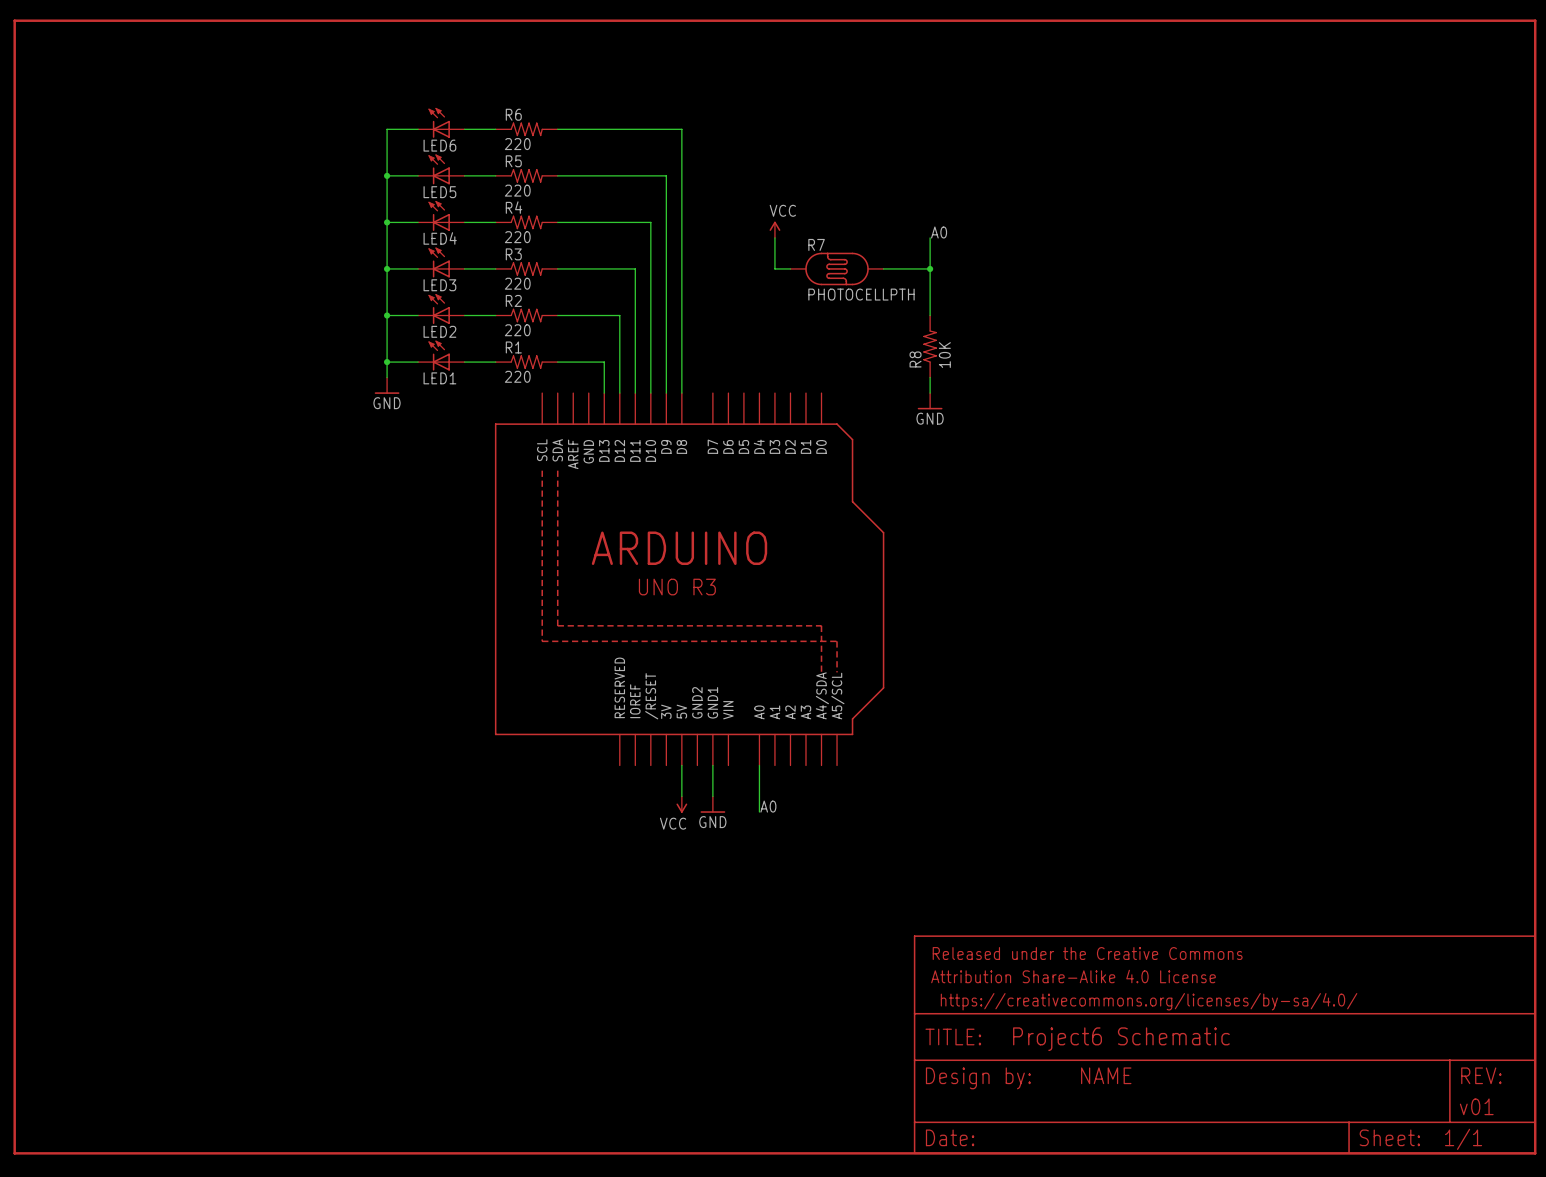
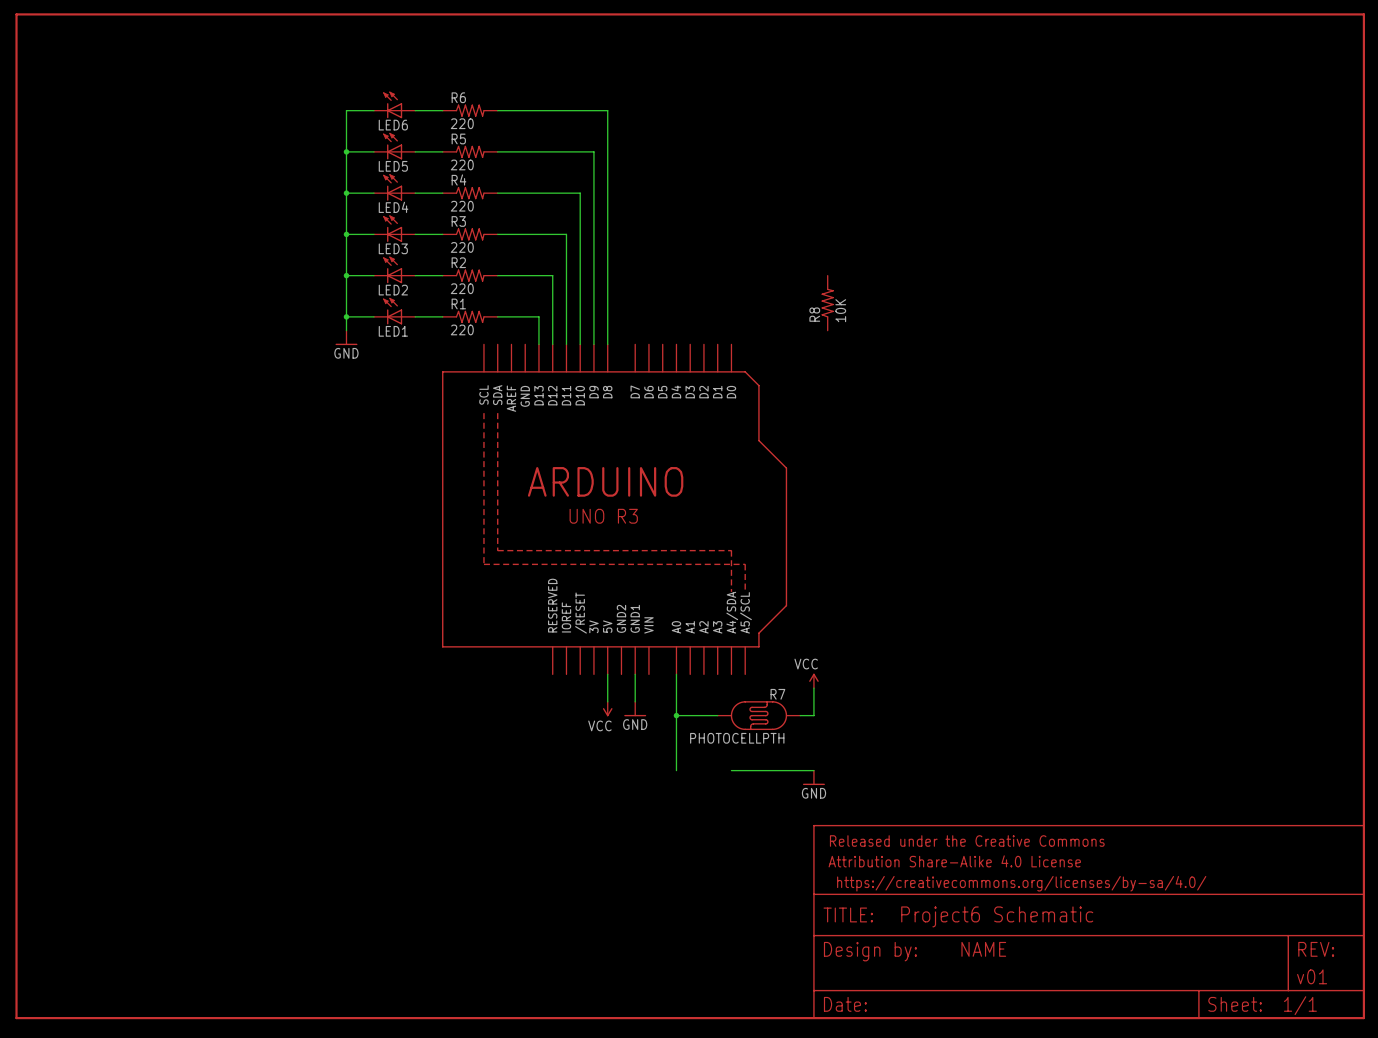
power symbol: VCC (774, 229) -> none
label: A0 (939, 232) -> none
wire: (774, 237) (774, 268) (790, 268) -> none
wire: (930, 237) (930, 315) -> none
R7 flip: as is (837, 268) -> left-right (758, 715)
R7 position: (837, 268) -> (758, 715)
wire: (883, 268) (930, 268) -> none
junction: (930, 268) -> none
wire: (930, 377) (930, 393) -> none
power symbol: GND (930, 401) -> none
power symbol: none -> VCC (813, 680)
wire: none -> (813, 688) (813, 715) (800, 715)
label: A0 (768, 806) -> none
junction: none -> (676, 715)
wire: none -> (717, 715) (676, 715) (676, 770)
wire: none -> (731, 770) (813, 770)
power symbol: none -> GND (813, 777)

